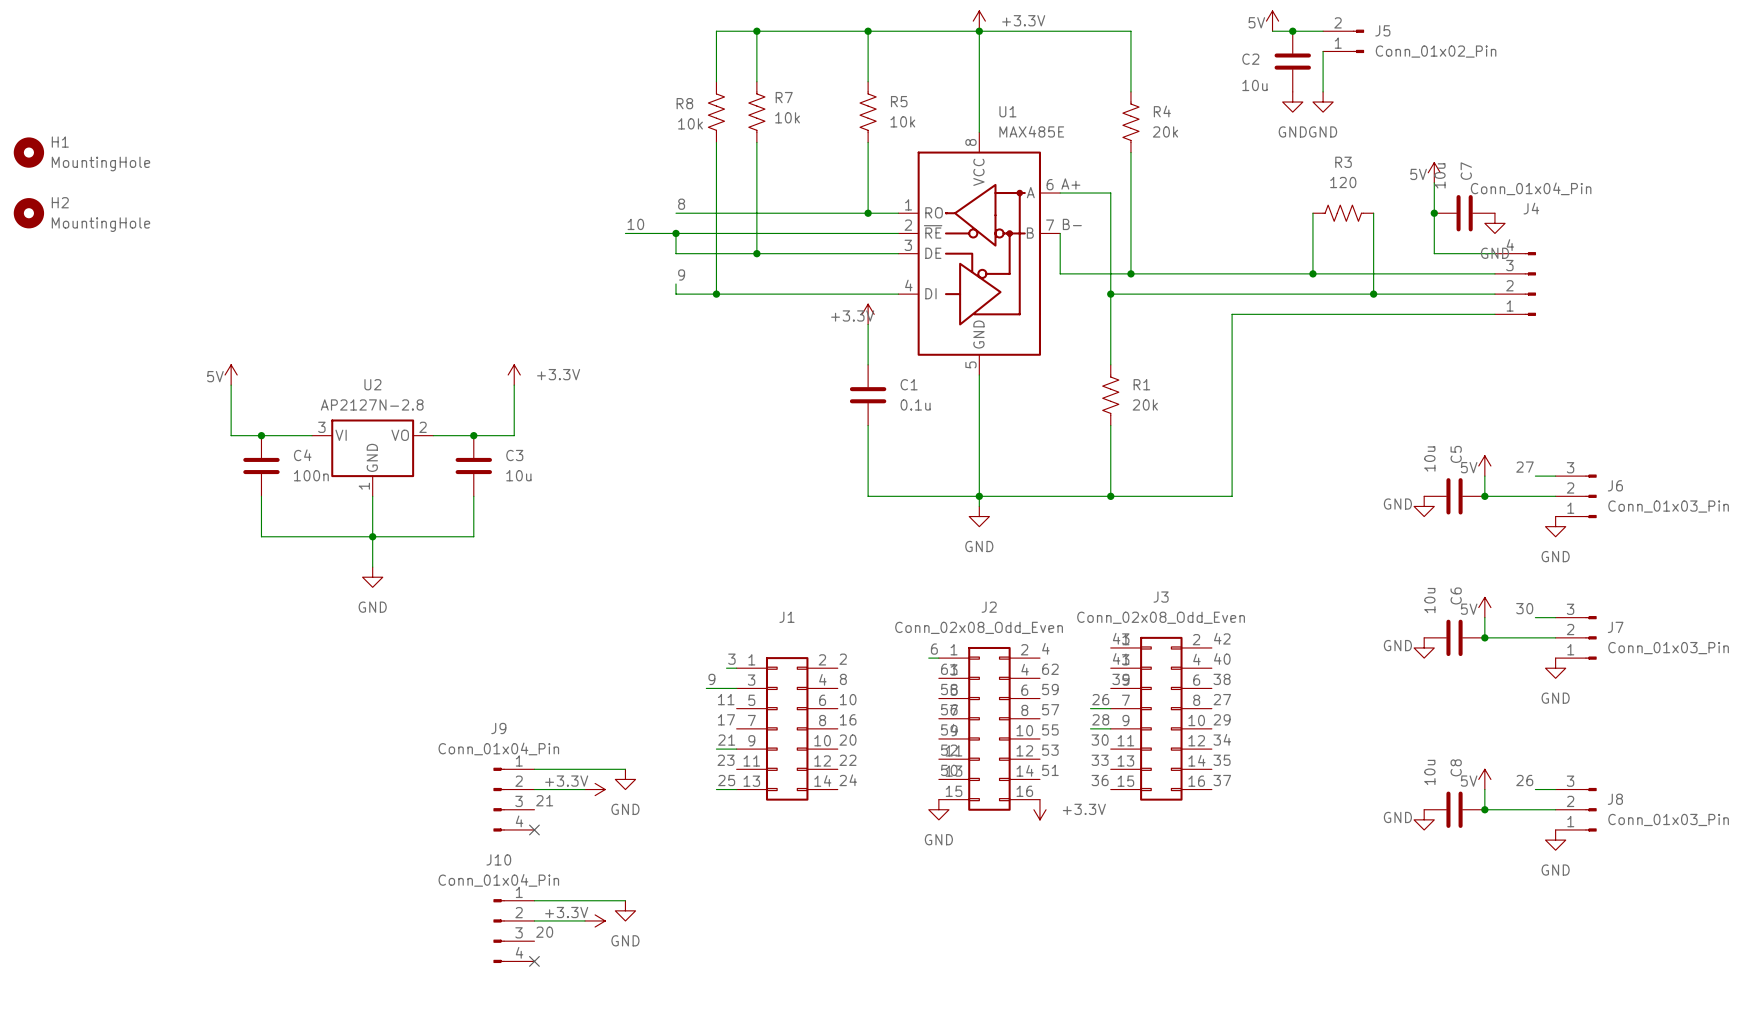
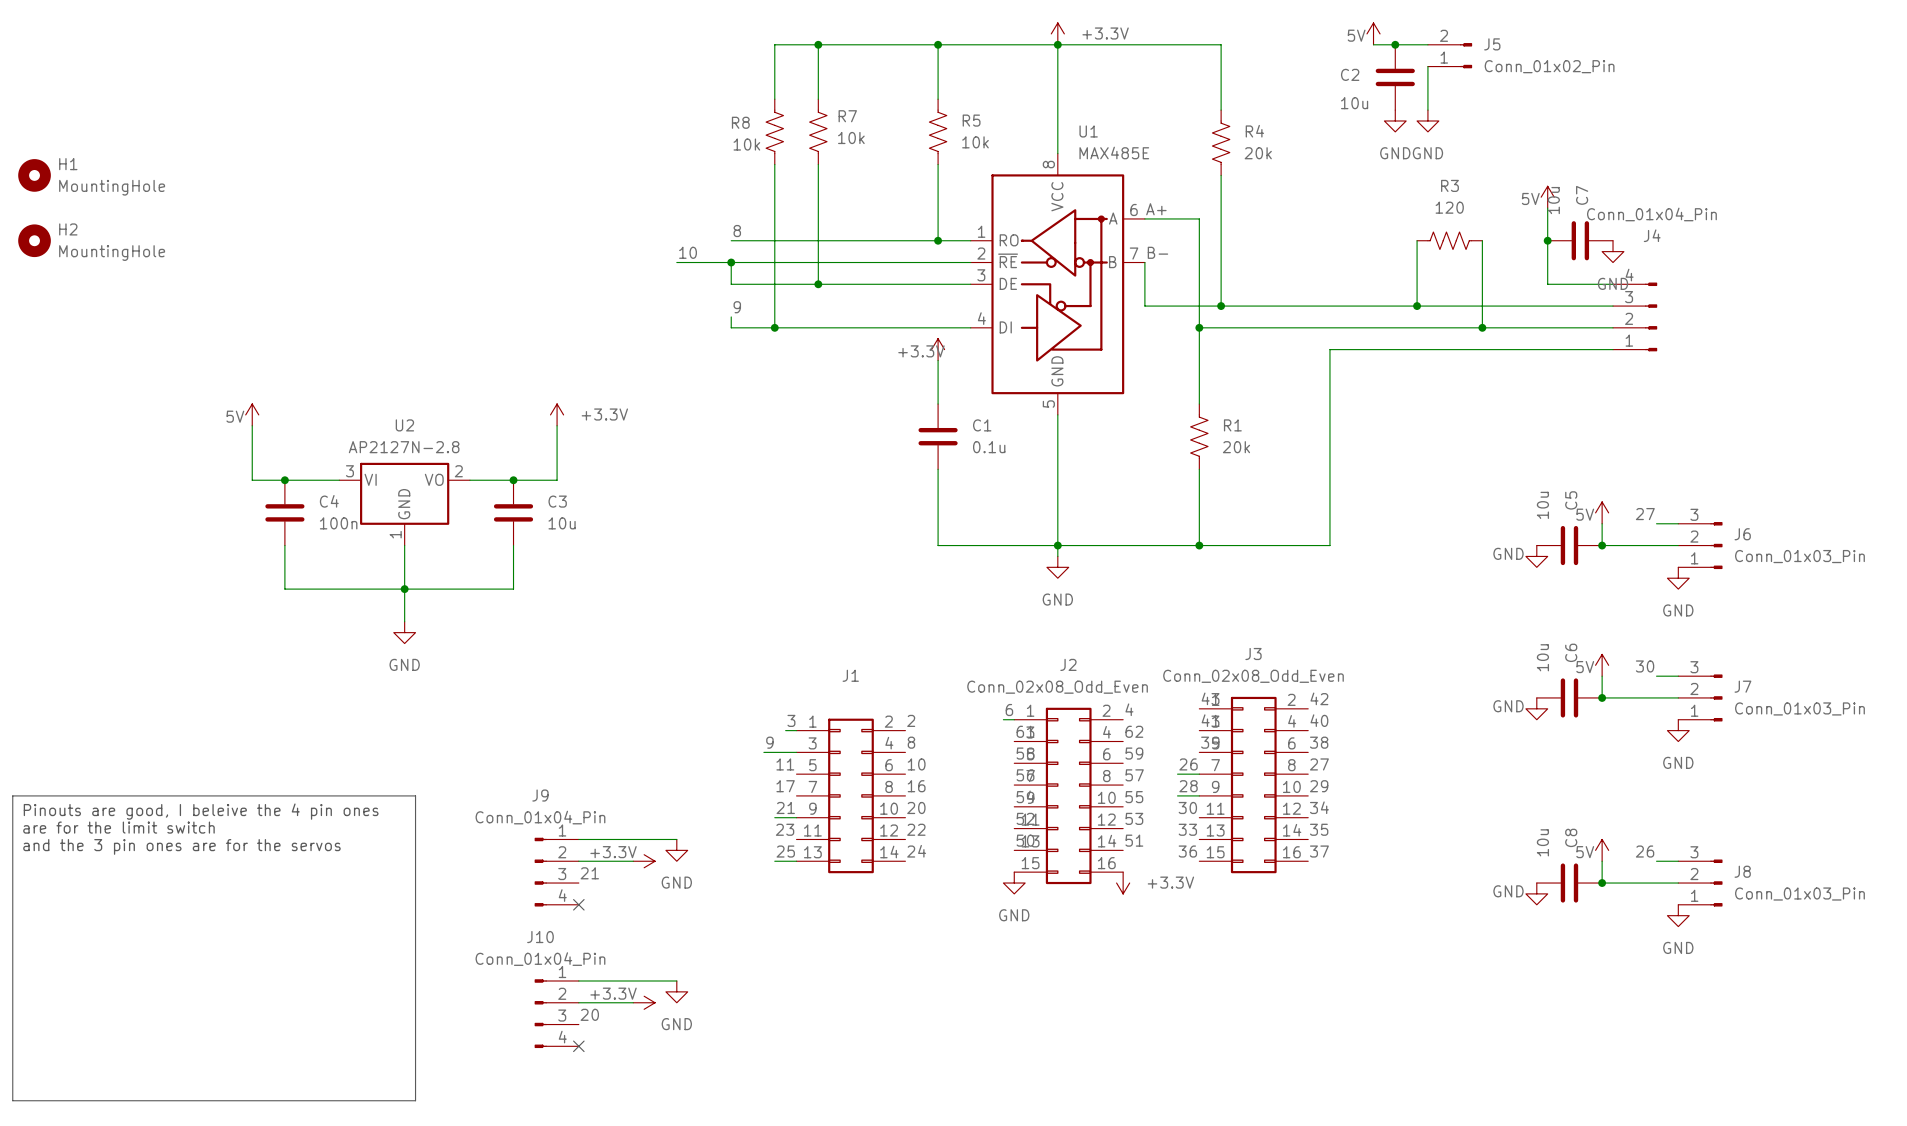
line: none -> (12, 795) (415, 795) (415, 1100) (12, 1100) (12, 795)
text: none -> Pinouts are good, I beleive the 4 pin ones (201, 811)
text: none -> are for the limit switch (118, 827)
text: none -> and the 3 pin ones are for the servos (181, 846)

